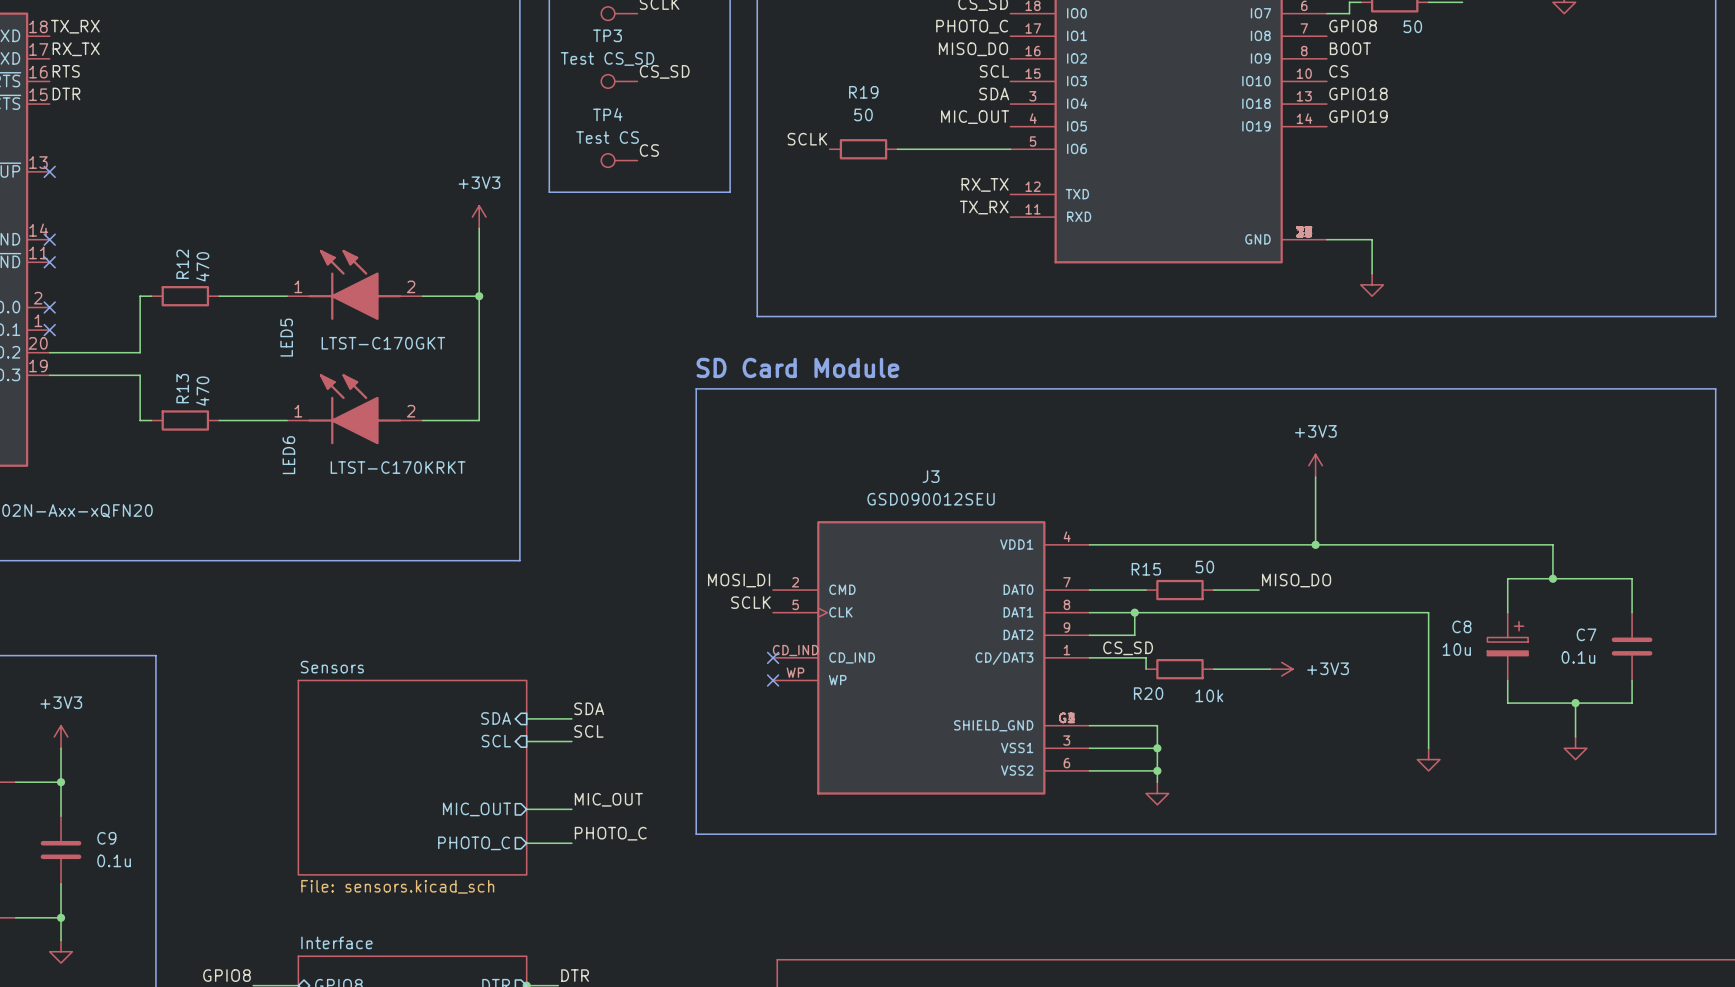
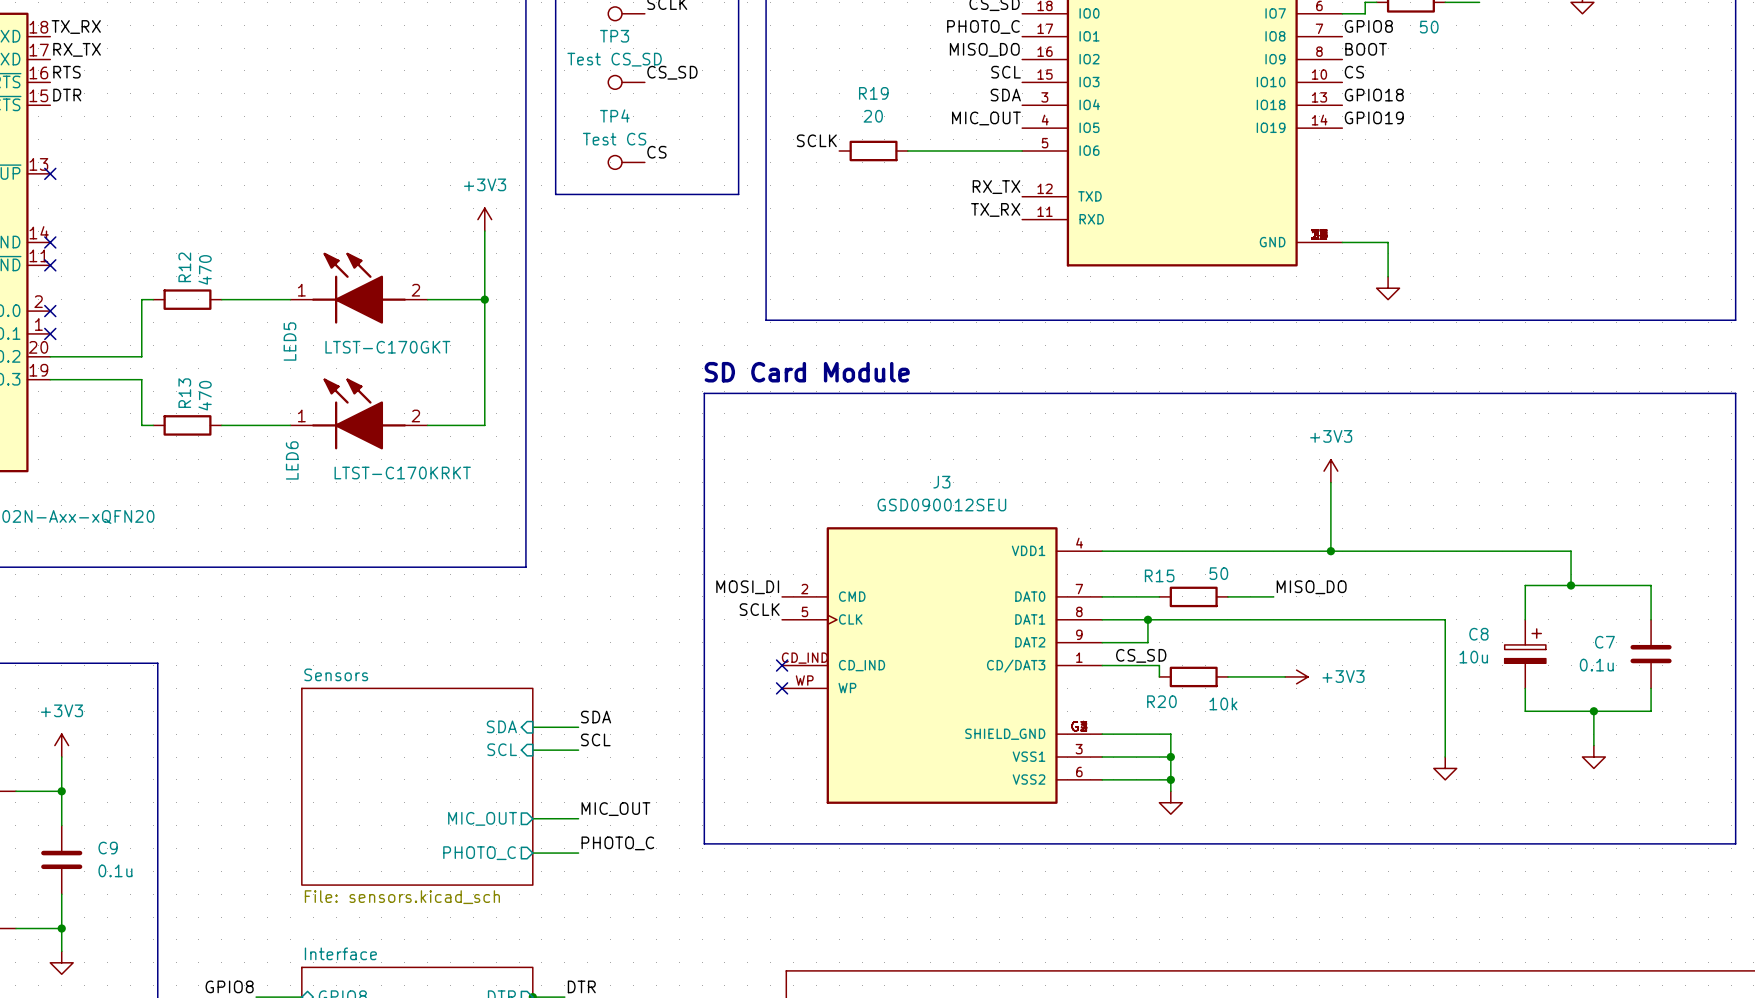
R19 value: 50 (863, 114) -> 20 (873, 116)

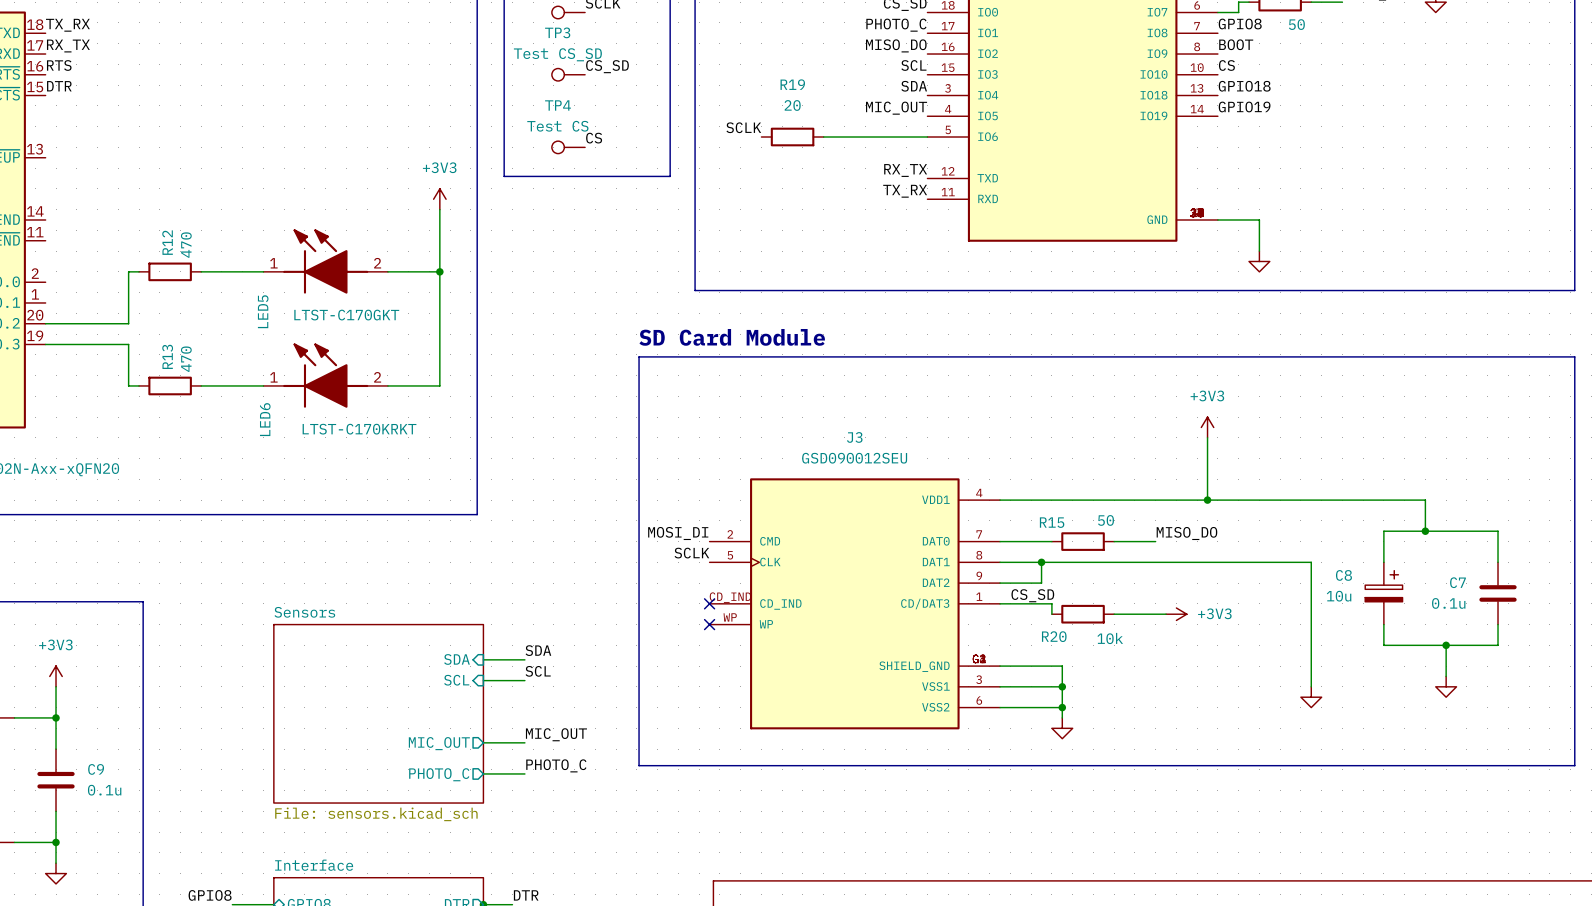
no-connect mark: (50, 173) -> none
no-connect mark: (50, 242) -> none
no-connect mark: (50, 265) -> none
no-connect mark: (50, 311) -> none
no-connect mark: (50, 333) -> none

